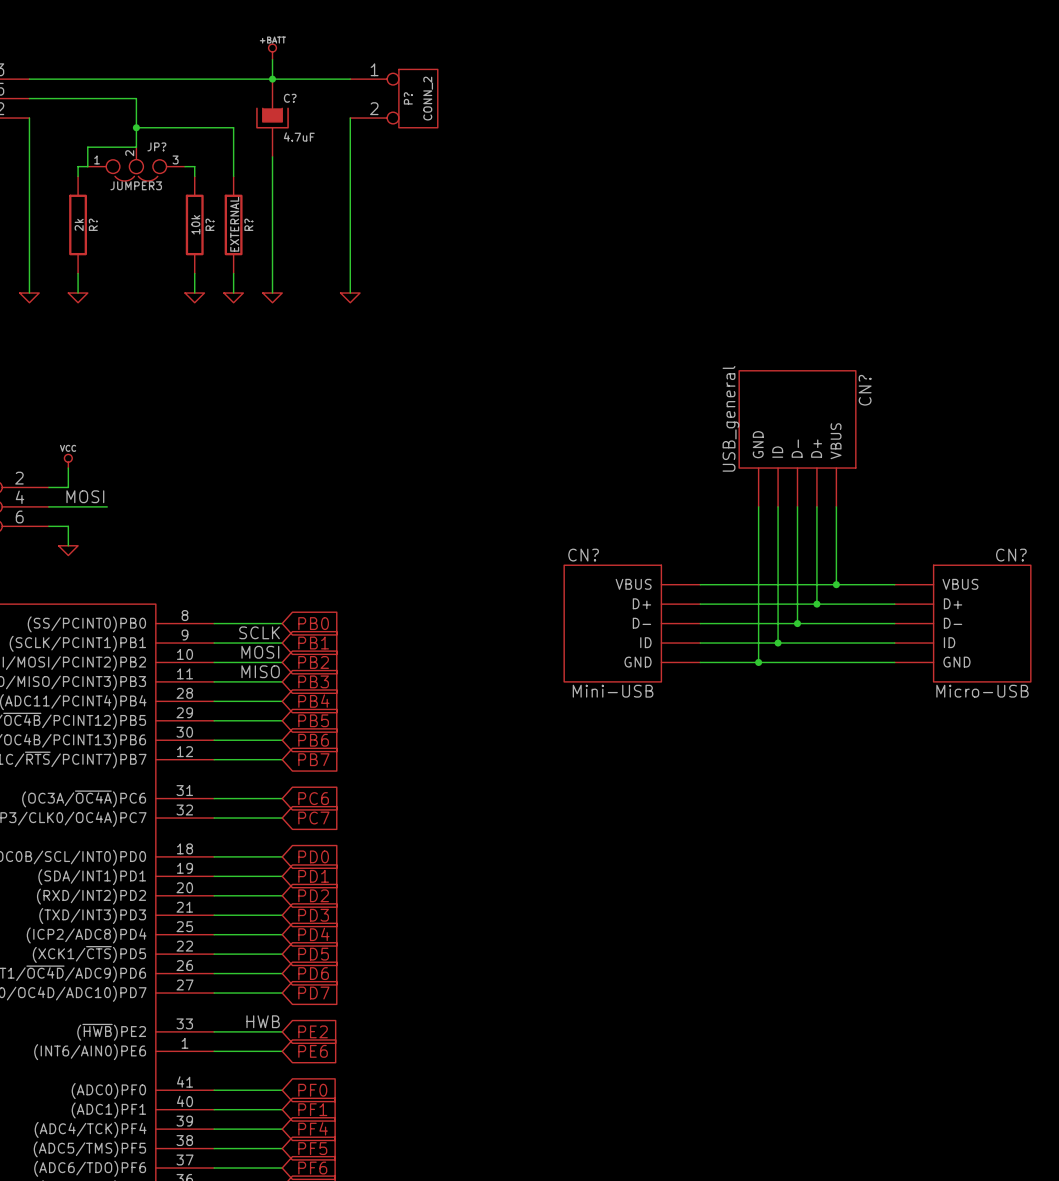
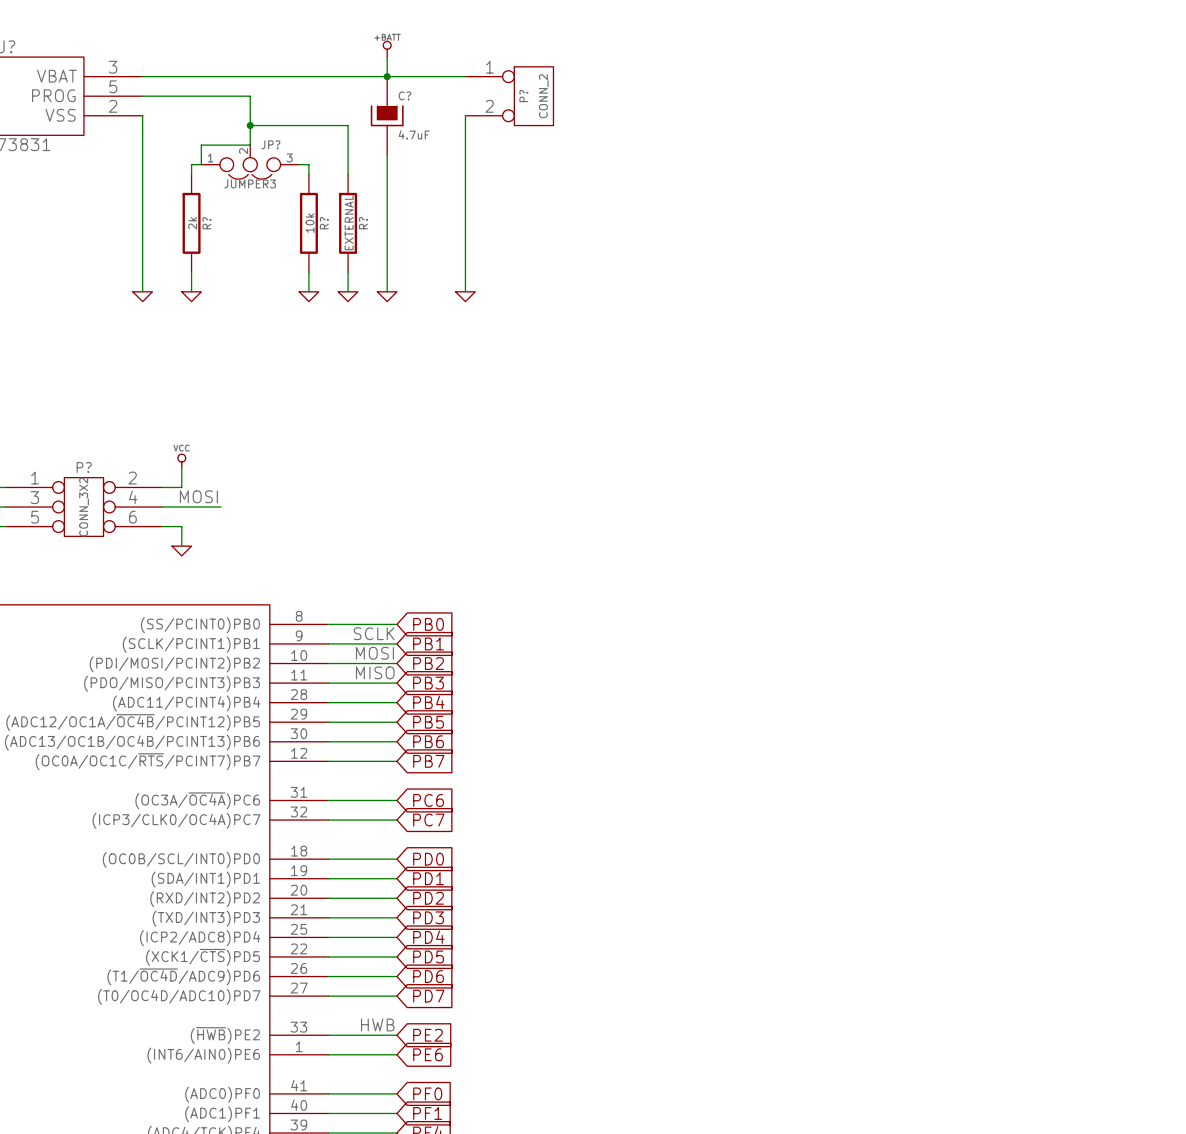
CN?: USB_general (797, 438) -> none
wire: (758, 506) (758, 662) -> none
wire: (778, 506) (778, 643) -> none
wire: (797, 506) (797, 623) -> none
wire: (816, 506) (816, 604) -> none
wire: (836, 506) (836, 584) -> none
wire: (700, 584) (894, 584) -> none
junction: (836, 584) -> none
wire: (700, 604) (894, 604) -> none
junction: (816, 604) -> none
CN?: Mini-USB (632, 623) -> none
wire: (700, 623) (894, 623) -> none
junction: (797, 623) -> none
CN?: Micro-USB (962, 623) -> none
wire: (700, 643) (894, 643) -> none
junction: (778, 643) -> none
wire: (700, 662) (894, 662) -> none
junction: (758, 662) -> none

